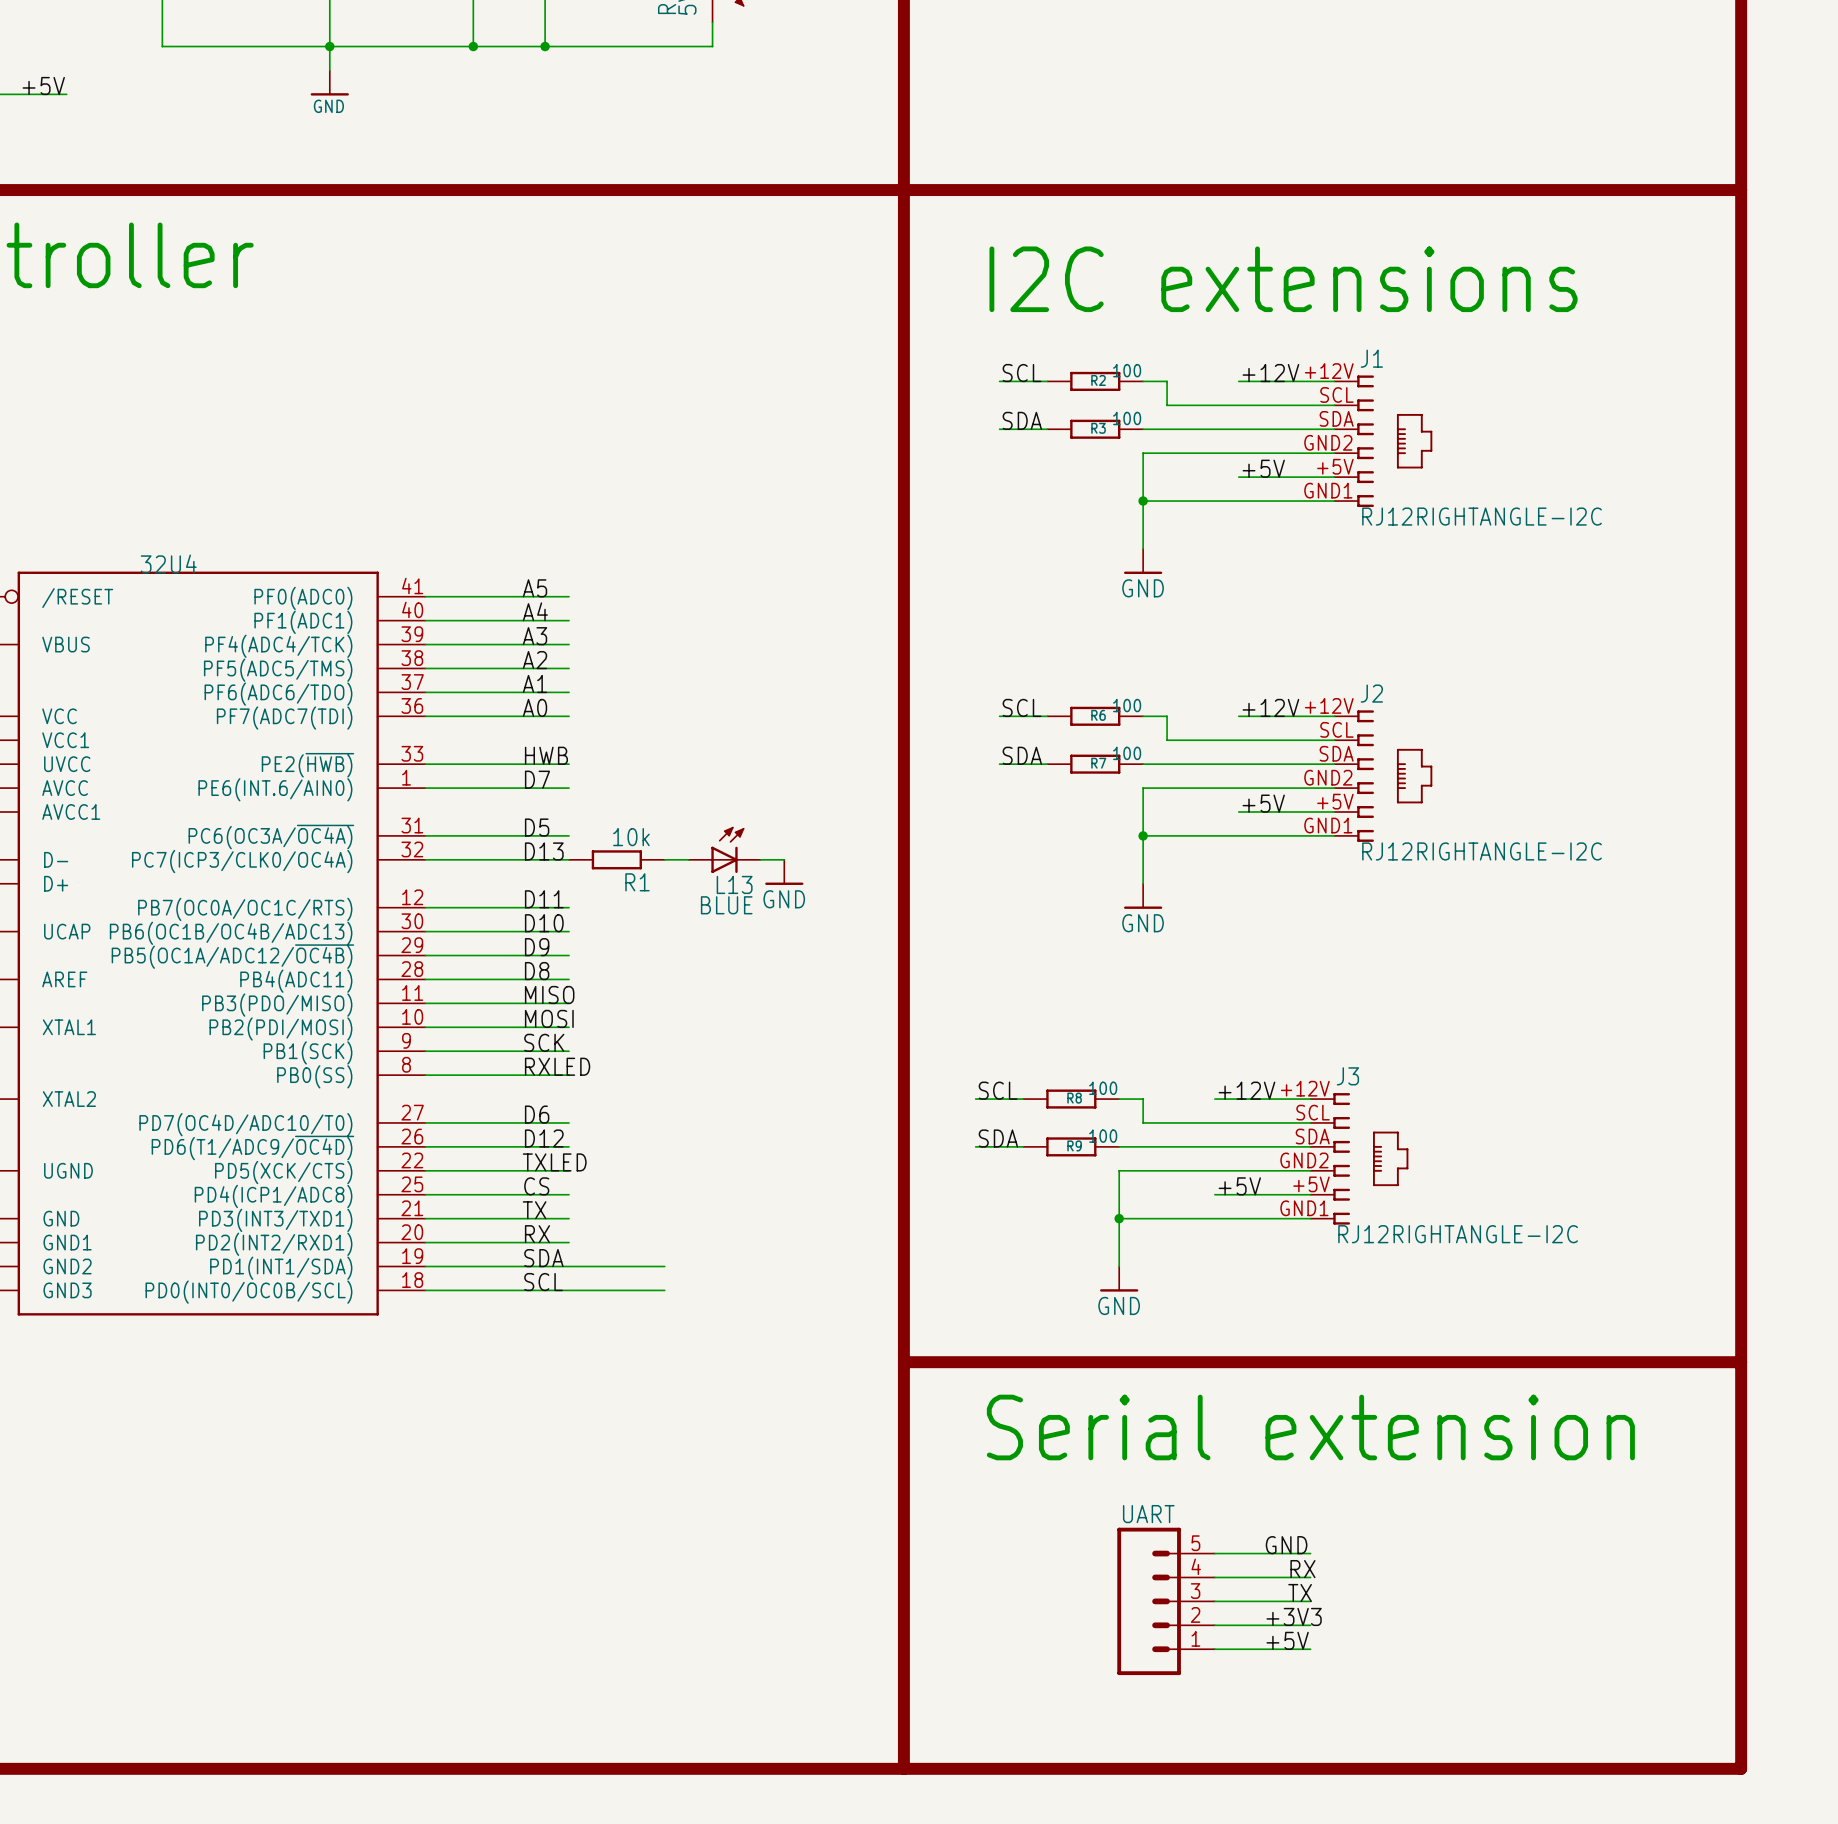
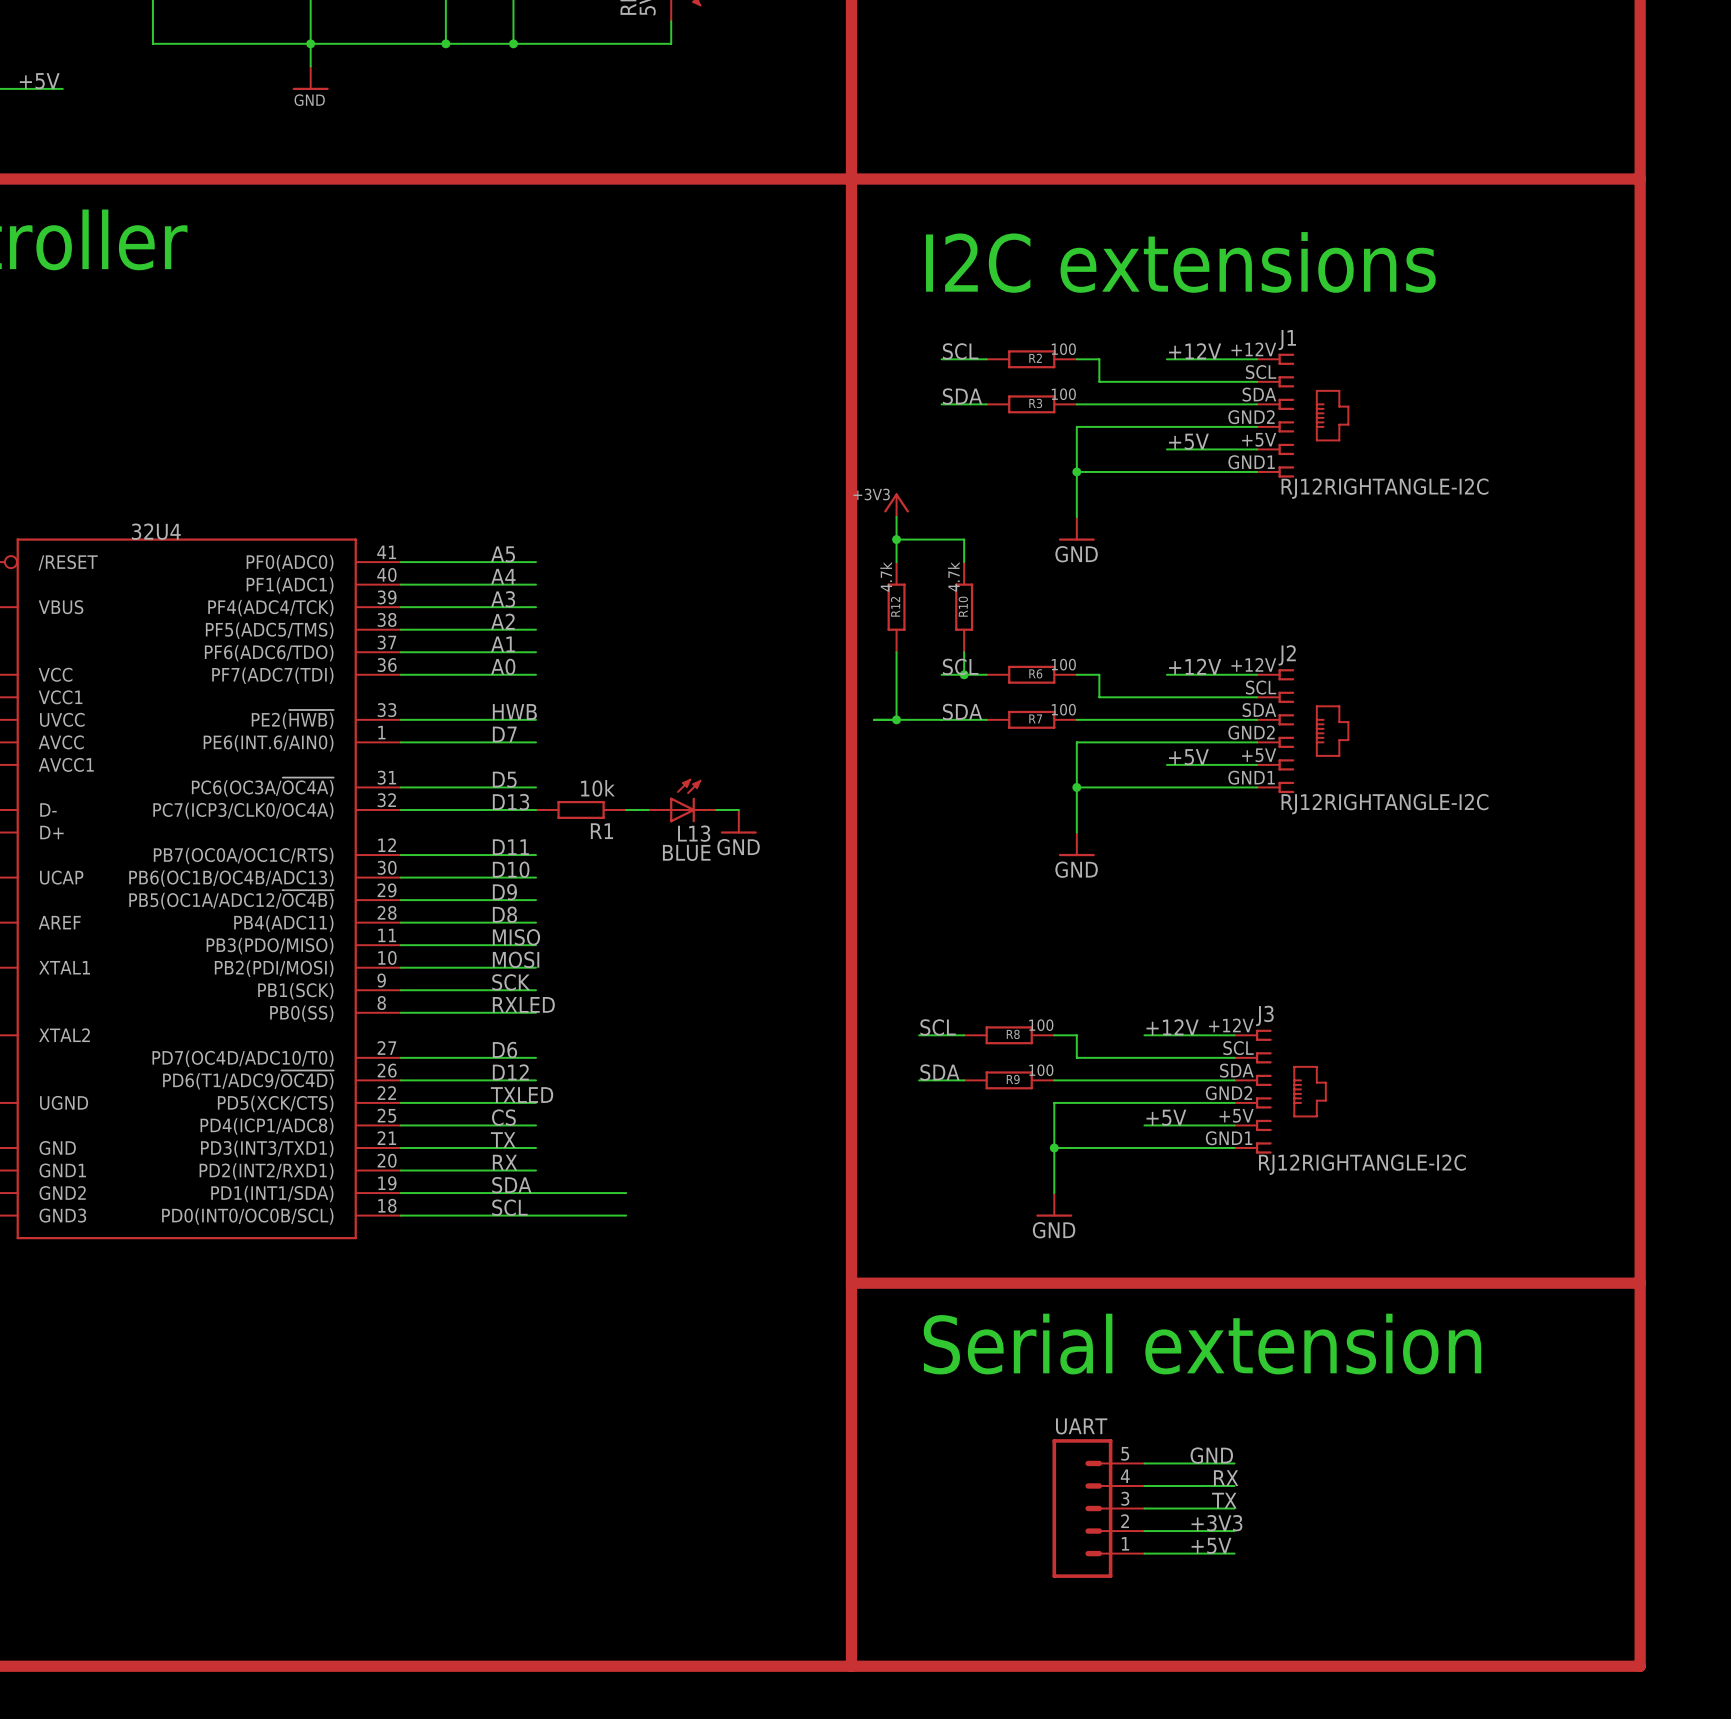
power symbol: none -> +3V3 (896, 505)
wire: none -> (896, 517) (896, 562)
wire: none -> (896, 539) (964, 539) (964, 562)
junction: none -> (896, 539)
R12: none -> 4.7k (896, 607)
R10: none -> 4.7k (964, 607)
wire: none -> (896, 652) (896, 719)
wire: none -> (964, 652) (964, 674)
junction: none -> (964, 674)
wire: none -> (874, 719) (941, 719)
junction: none -> (896, 719)

